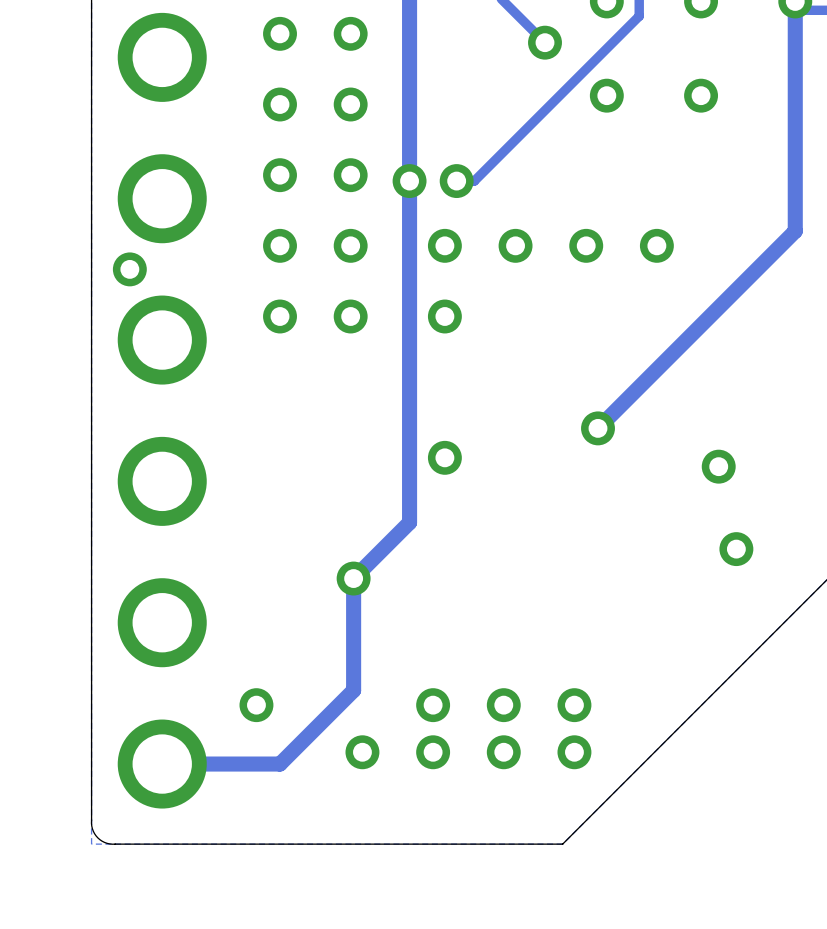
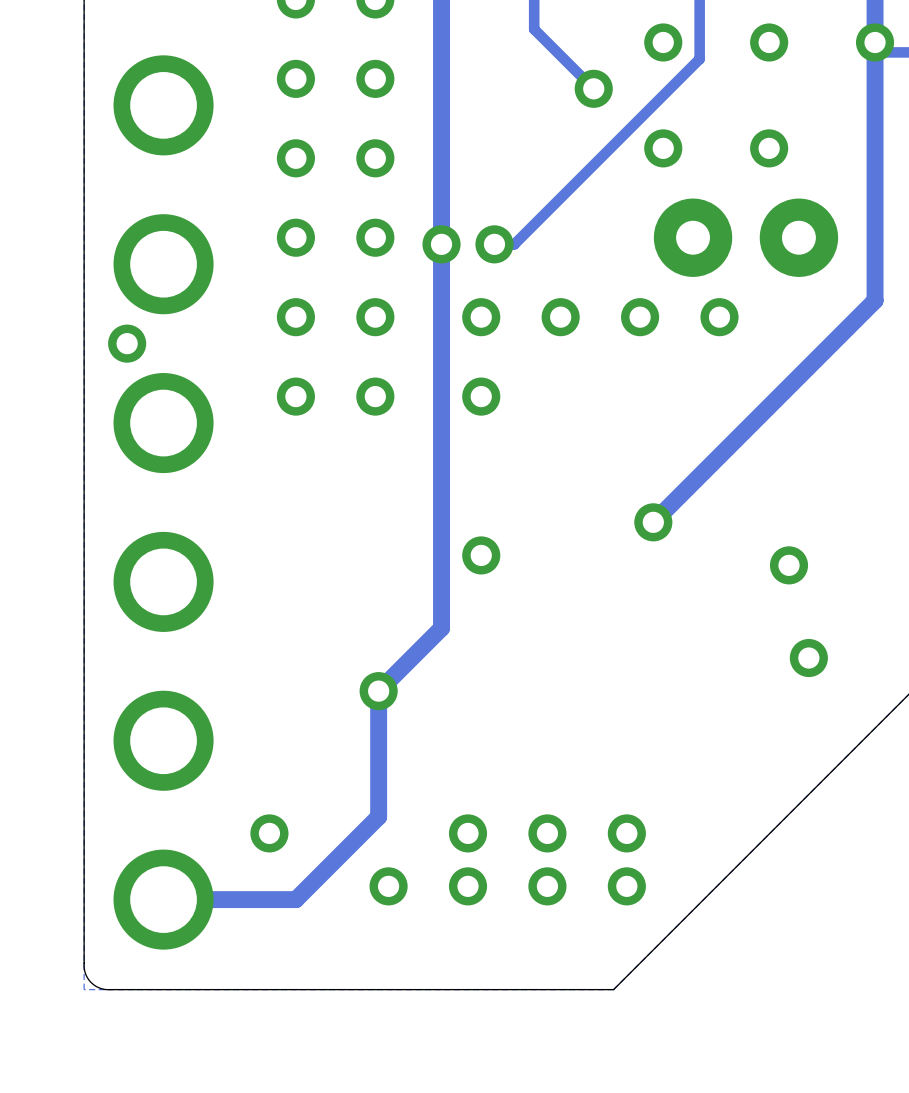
part: none -> (745, 237)

